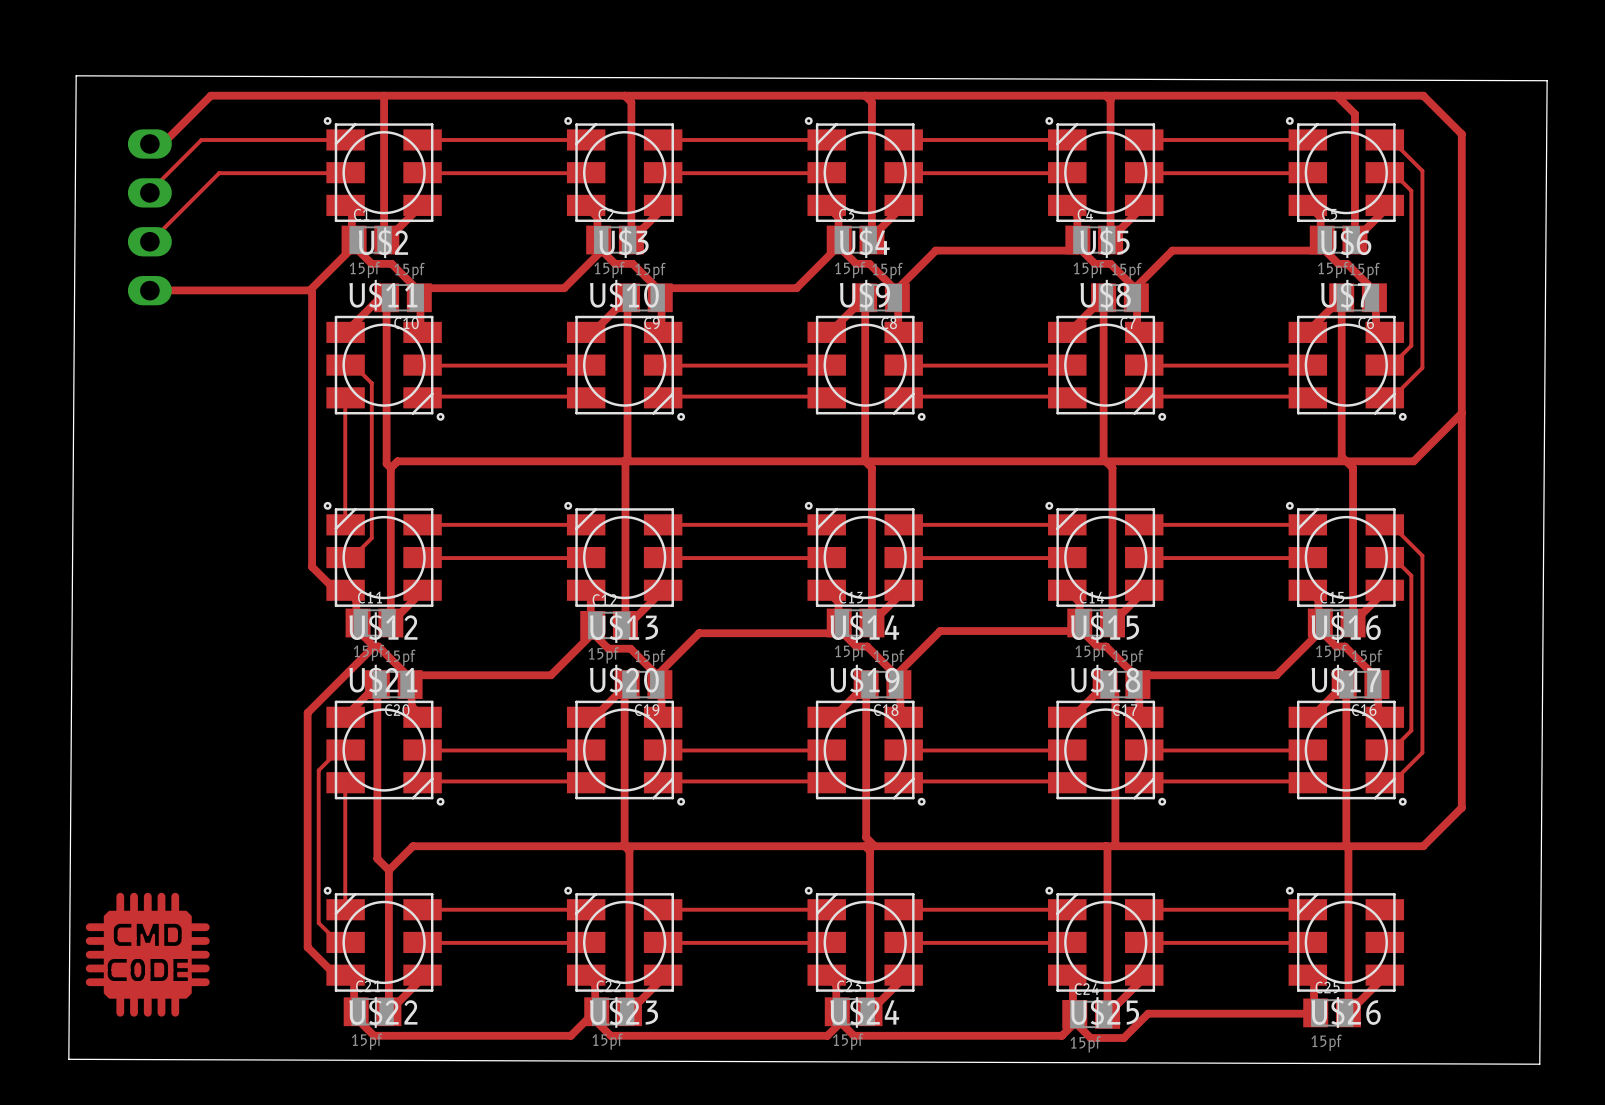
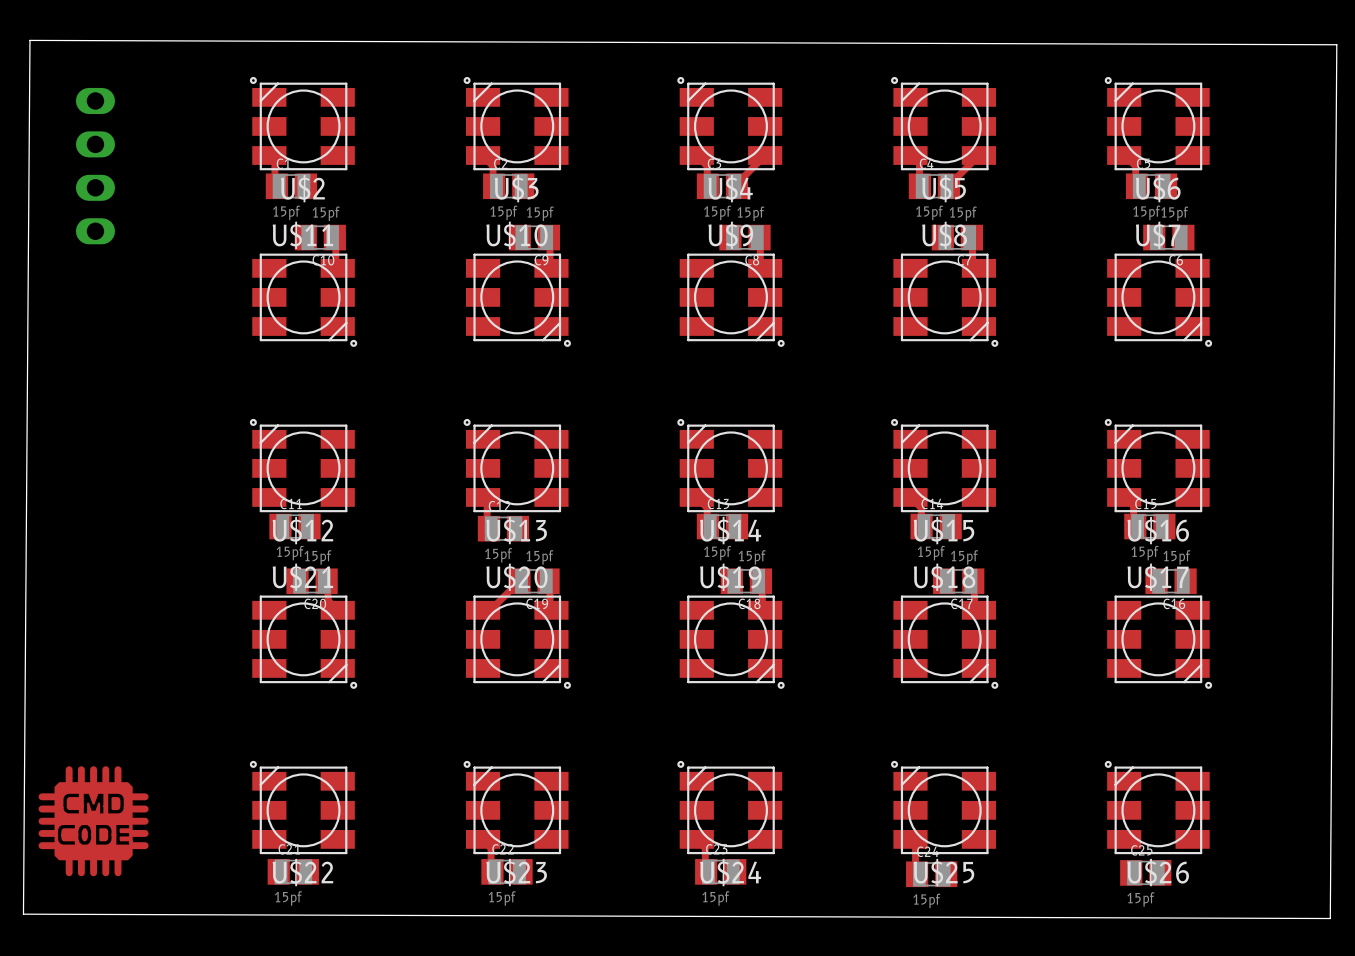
top track: (384, 95) (384, 237) (386, 240) (422, 205) -> none
top track: (624, 95) (631, 102) (631, 240) (663, 208) (663, 205) -> none
top track: (865, 95) (871, 102) (871, 240) -> none
top track: (1105, 95) (1110, 100) (1110, 240) -> none
top track: (1336, 95) (1354, 113) (1354, 240) (1384, 210) (1384, 205) -> none
top track: (345, 139) (201, 139) (149, 192) -> none
top track: (422, 139) (586, 139) -> none
top track: (663, 139) (826, 139) -> none
top track: (903, 139) (1067, 139) -> none
top track: (1144, 139) (1307, 139) -> none
top track: (1384, 139) (1391, 139) (1422, 170) (1422, 367) (1393, 396) (1384, 397) -> none
top track: (149, 143) (162, 143) (210, 95) (1423, 95) (1461, 134) (1461, 807) (1423, 846) (412, 846) (388, 870) -> none
top track: (345, 172) (219, 173) (149, 241) -> none
top track: (422, 172) (586, 172) -> none
top track: (663, 172) (826, 172) -> none
top track: (903, 172) (1067, 172) -> none
top track: (1144, 172) (1307, 172) -> none
top track: (1384, 172) (1393, 173) (1411, 190) (1411, 345) (1393, 363) (1384, 363) (1384, 365) -> none
top track: (309, 290) (149, 290) -> none
top track: (309, 290) (351, 248) (354, 240) (354, 246) (371, 263) (391, 263) (418, 290) (419, 297) (420, 288) (564, 288) (599, 252) (598, 240) (601, 241) (601, 250) (615, 263) (632, 263) (659, 290) (660, 297) (661, 288) (796, 288) (836, 248) (839, 240) (838, 246) (856, 263) (869, 263) (896, 290) (897, 297) (898, 288) (935, 250) (1077, 250) (1077, 240) (1079, 248) (1095, 263) (1110, 263) (1134, 288) (1136, 297) (1137, 285) (1172, 250) (1320, 250) (1322, 240) (1322, 248) (1338, 263) (1347, 263) (1373, 290) (1375, 299) (1375, 323) (1384, 332) -> none
top track: (309, 290) (312, 292) (312, 566) (334, 589) (345, 590) (356, 600) (356, 622) (358, 622) (358, 631) (374, 646) -> none
top track: (345, 332) (380, 297) (386, 297) (386, 463) (390, 468) -> none
top track: (586, 332) (592, 332) (627, 297) (627, 458) (624, 461) -> none
top track: (826, 332) (829, 332) (865, 298) (865, 461) (871, 468) (871, 622) (903, 590) -> none
top track: (1067, 332) (1103, 297) (1103, 459) (1112, 468) (1112, 622) (1144, 590) -> none
top track: (1307, 332) (1341, 297) (1341, 456) (1353, 468) (1353, 622) (1384, 590) -> none
top track: (345, 365) (354, 365) (371, 383) (371, 538) (354, 555) (345, 557) -> none
top track: (422, 365) (586, 365) -> none
top track: (663, 365) (826, 365) -> none
top track: (903, 365) (1067, 365) -> none
top track: (1144, 365) (1307, 365) -> none
top track: (345, 397) (345, 524) -> none
top track: (422, 397) (586, 397) -> none
top track: (663, 397) (826, 397) -> none
top track: (903, 397) (1067, 397) -> none
top track: (1144, 397) (1307, 397) -> none
top track: (1461, 413) (1413, 461) (397, 461) (390, 468) -> none
top track: (625, 460) (625, 625) (627, 625) (663, 590) -> none
top track: (390, 468) (390, 622) (422, 590) -> none
top track: (422, 524) (586, 524) -> none
top track: (663, 524) (826, 524) -> none
top track: (903, 524) (1067, 524) -> none
top track: (1144, 524) (1307, 524) -> none
top track: (1384, 524) (1391, 524) (1422, 555) (1422, 752) (1393, 781) (1384, 782) -> none
top track: (422, 557) (586, 557) -> none
top track: (663, 557) (826, 557) -> none
top track: (903, 557) (1067, 557) -> none
top track: (1144, 557) (1307, 557) -> none
top track: (1384, 557) (1393, 558) (1411, 575) (1411, 730) (1393, 748) (1384, 748) (1384, 750) -> none
top track: (374, 646) (378, 646) (409, 677) (410, 684) (411, 675) (550, 675) (590, 635) (592, 625) (592, 633) (608, 648) (630, 648) (657, 675) (657, 681) (659, 684) (659, 673) (699, 633) (838, 633) (839, 622) (840, 631) (856, 646) (867, 646) (896, 675) (896, 681) (898, 684) (898, 673) (940, 631) (1077, 631) (1079, 622) (1079, 628) (1097, 646) (1106, 646) (1137, 677) (1137, 684) (1139, 675) (1276, 675) (1318, 633) (1320, 622) (1320, 631) (1336, 646) (1345, 646) (1375, 677) (1378, 686) (1378, 710) (1384, 717) -> none
top track: (374, 646) (307, 712) (307, 947) (334, 973) (343, 973) (354, 982) (354, 1011) (358, 1013) (358, 1020) (374, 1035) (570, 1035) (596, 1011) (592, 1018) (610, 1035) (827, 1035) (838, 1024) (837, 1011) (840, 1013) (840, 1022) (853, 1035) (1061, 1035) (1072, 1024) (1074, 1014) (1075, 1022) (1090, 1038) (1123, 1038) (1148, 1013) (1315, 1012) (1314, 1011) (1314, 980) (1307, 975) -> none
top track: (624, 687) (624, 846) (629, 851) (629, 1011) (663, 978) (663, 975) -> none
top track: (345, 717) (377, 684) (377, 858) (388, 870) -> none
top track: (826, 717) (833, 717) (866, 684) (866, 837) (874, 846) -> none
top track: (1067, 717) (1072, 717) (1105, 684) (1115, 694) (1115, 846) -> none
top track: (1307, 717) (1311, 717) (1344, 684) (1346, 686) (1348, 1012) (1384, 975) -> none
top track: (345, 750) (338, 750) (318, 770) (318, 922) (336, 940) (345, 940) (345, 942) -> none
top track: (422, 750) (586, 750) -> none
top track: (663, 750) (826, 750) -> none
top track: (903, 750) (1067, 750) -> none
top track: (1144, 750) (1307, 750) -> none
top track: (345, 782) (345, 909) -> none
top track: (422, 782) (586, 782) -> none
top track: (663, 782) (826, 782) -> none
top track: (903, 782) (1067, 782) -> none
top track: (1144, 782) (1307, 782) -> none
top track: (865, 846) (870, 851) (870, 1011) (903, 978) (903, 975) -> none
top track: (1105, 846) (1107, 847) (1107, 1014) (1144, 977) (1144, 975) -> none
top track: (388, 870) (388, 1011) (422, 978) (422, 975) -> none
top track: (422, 909) (586, 909) -> none
top track: (663, 909) (826, 909) -> none
top track: (903, 909) (1067, 909) -> none
top track: (1144, 909) (1307, 909) -> none
top track: (422, 942) (586, 942) -> none
top track: (663, 942) (826, 942) -> none
top track: (903, 942) (1067, 942) -> none
top track: (1144, 942) (1307, 942) -> none

